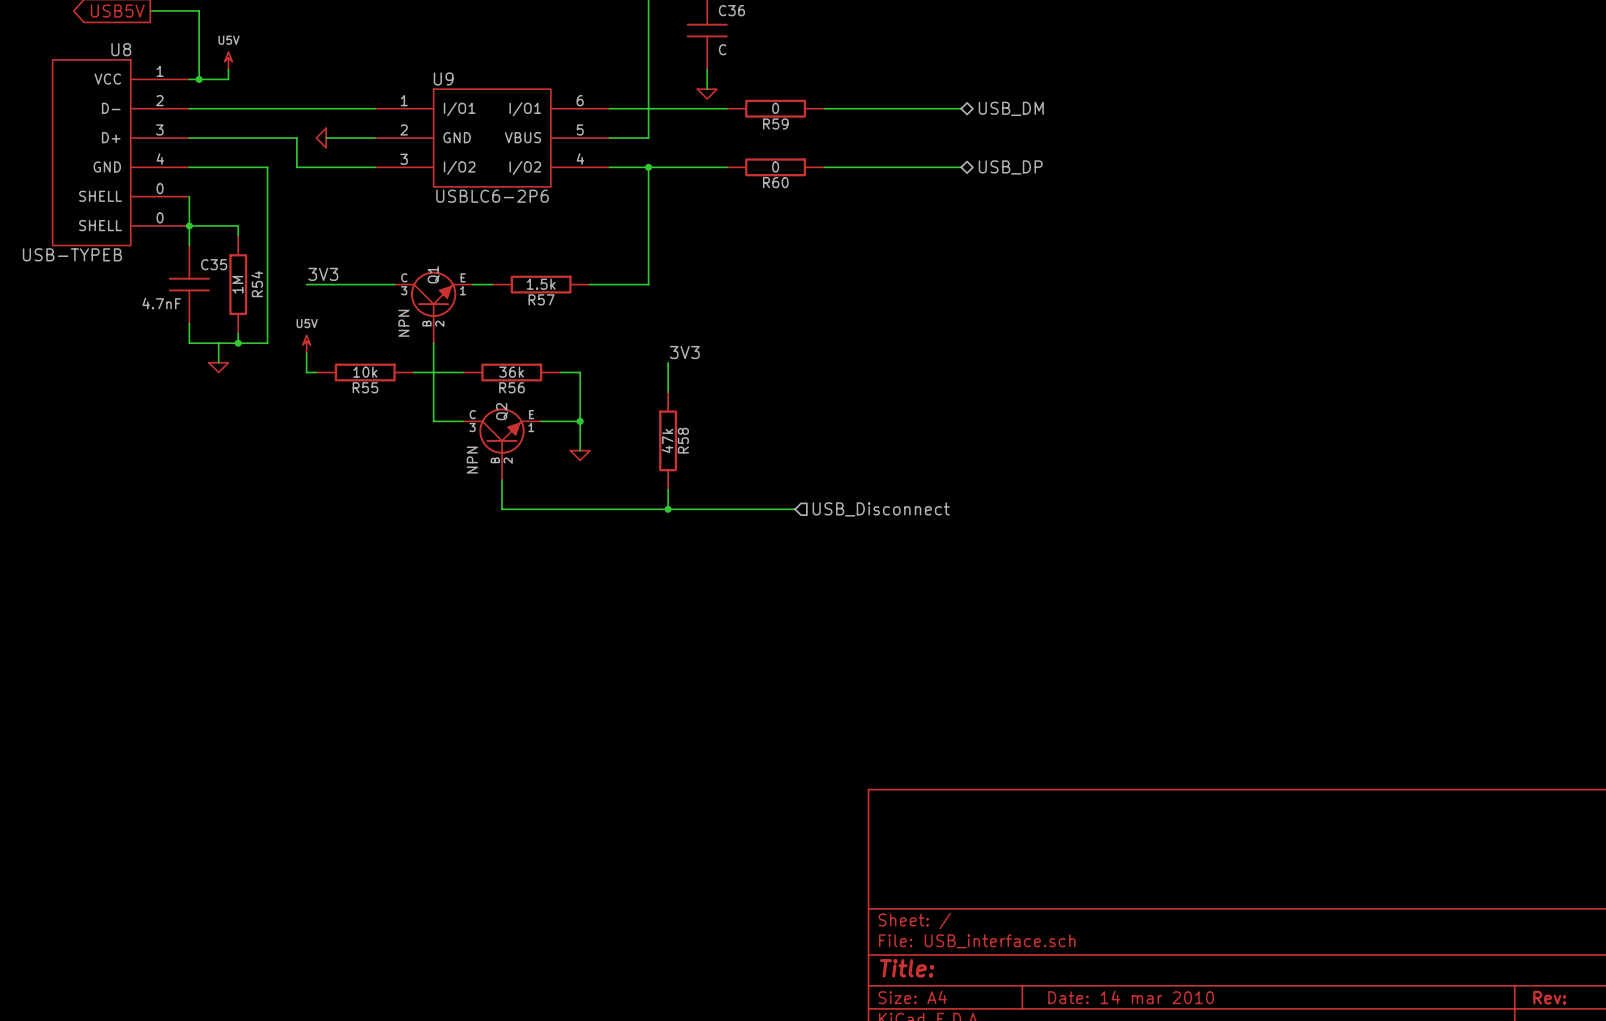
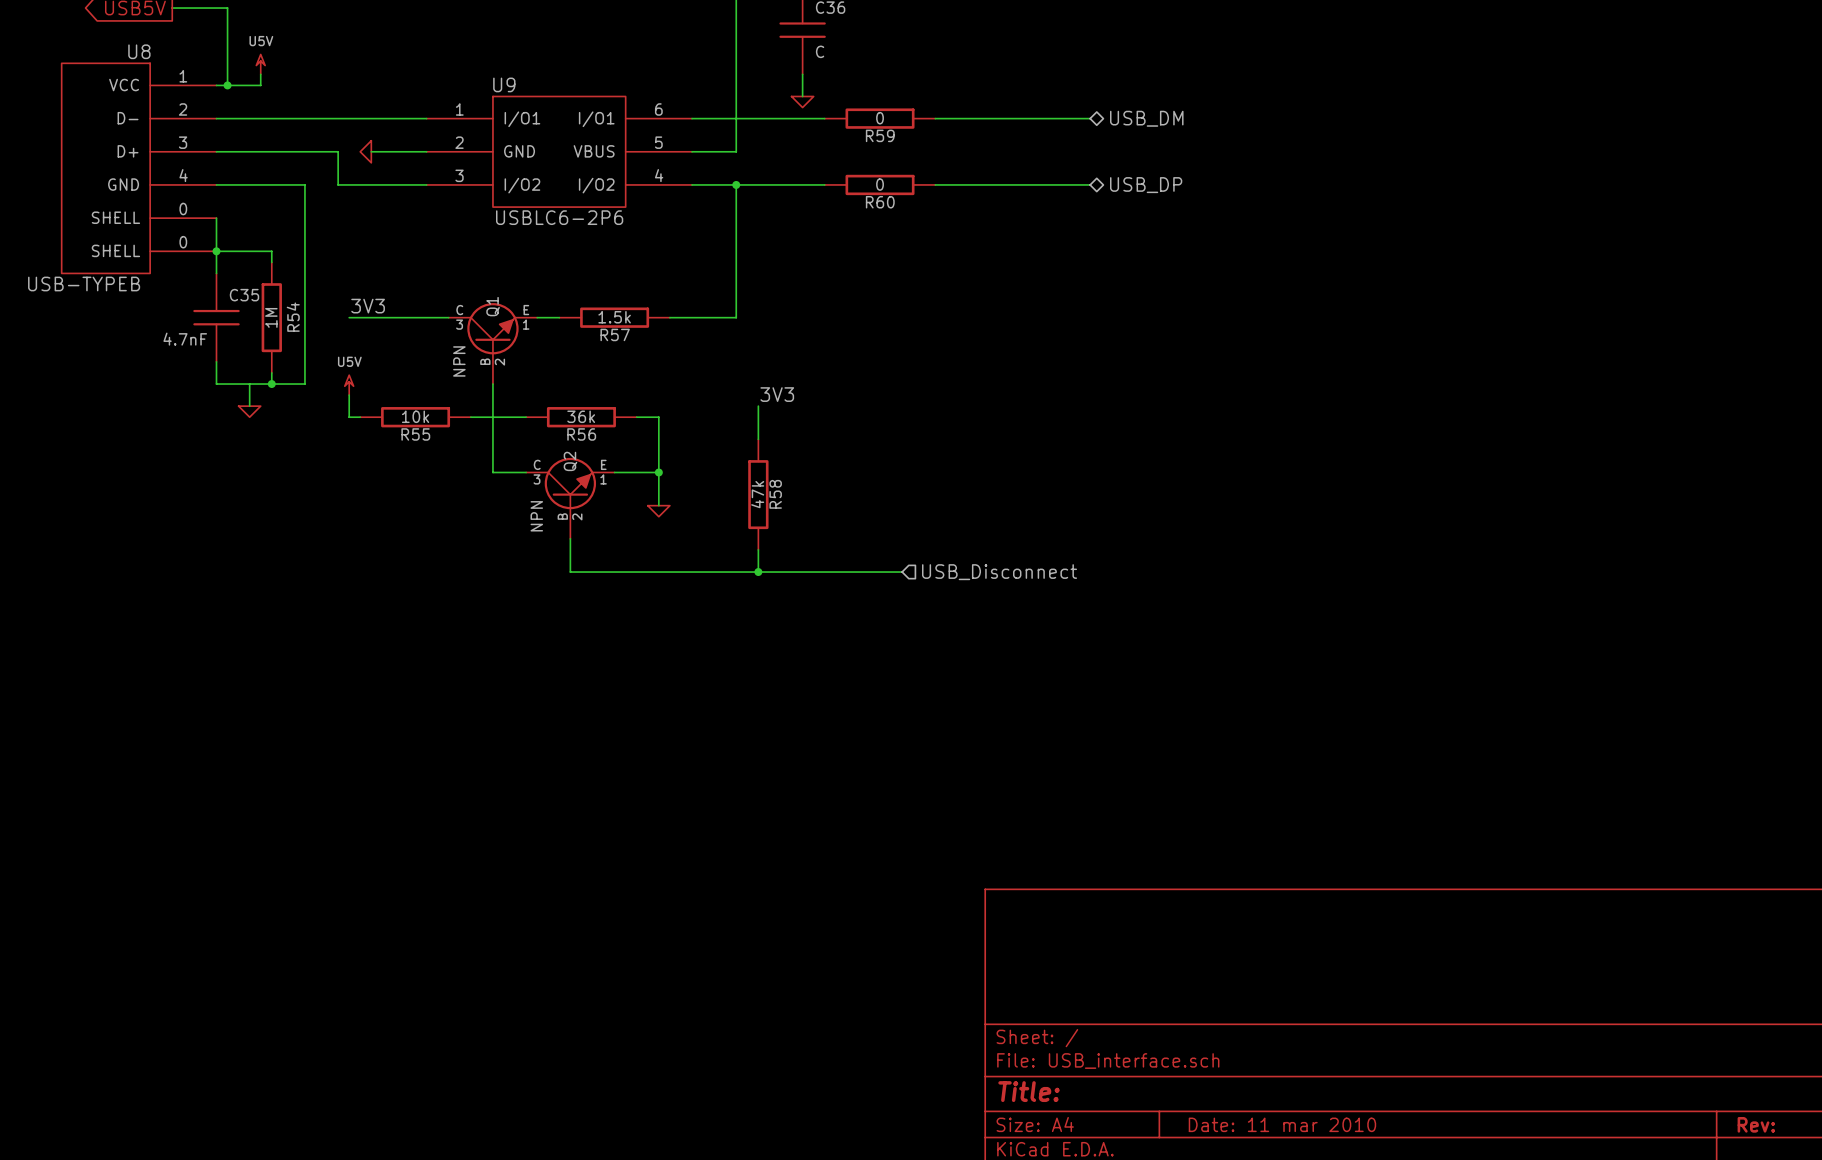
title block: Date: 14 mar 2010 (1131, 997) -> Date: 11 mar 2010 (1282, 1124)

